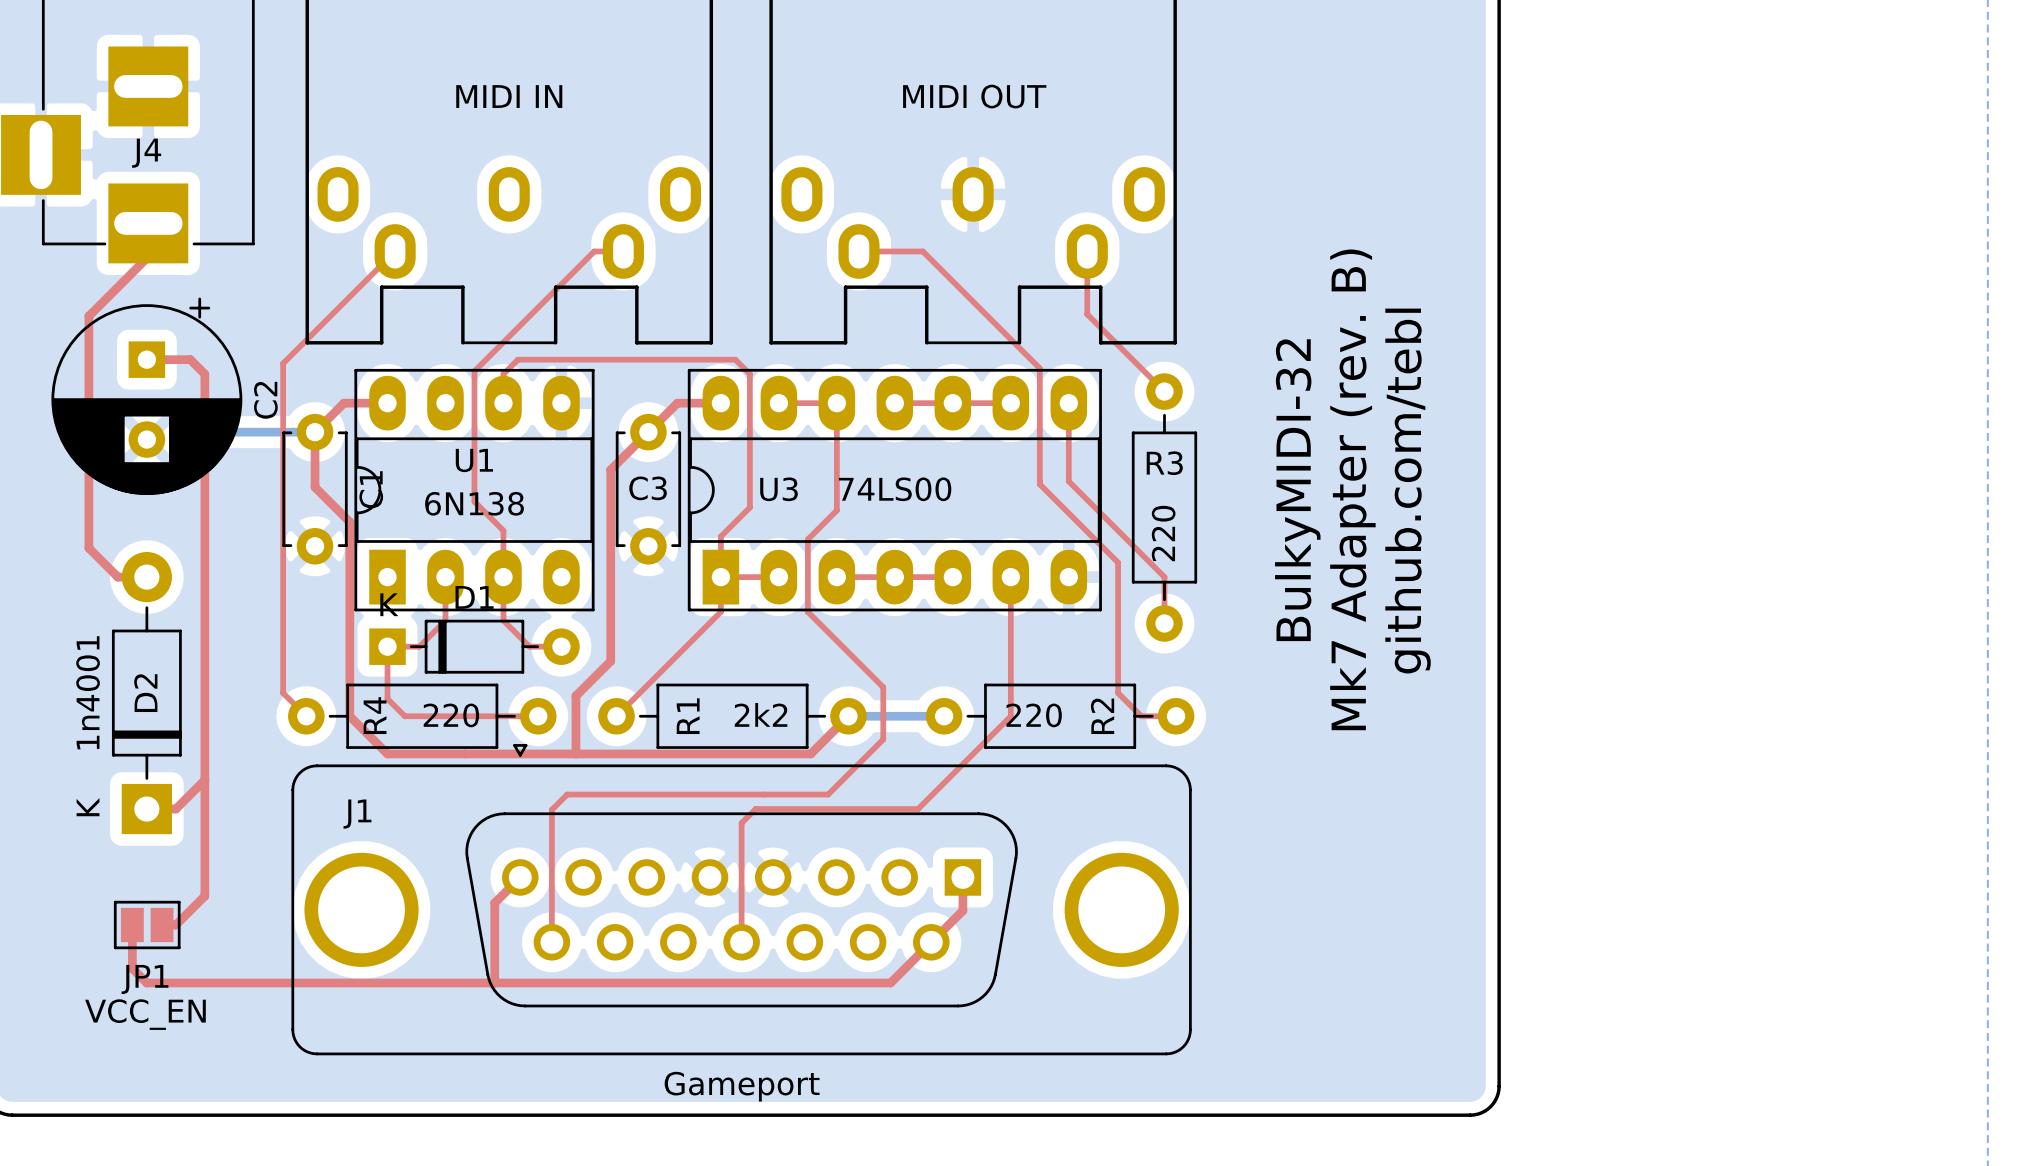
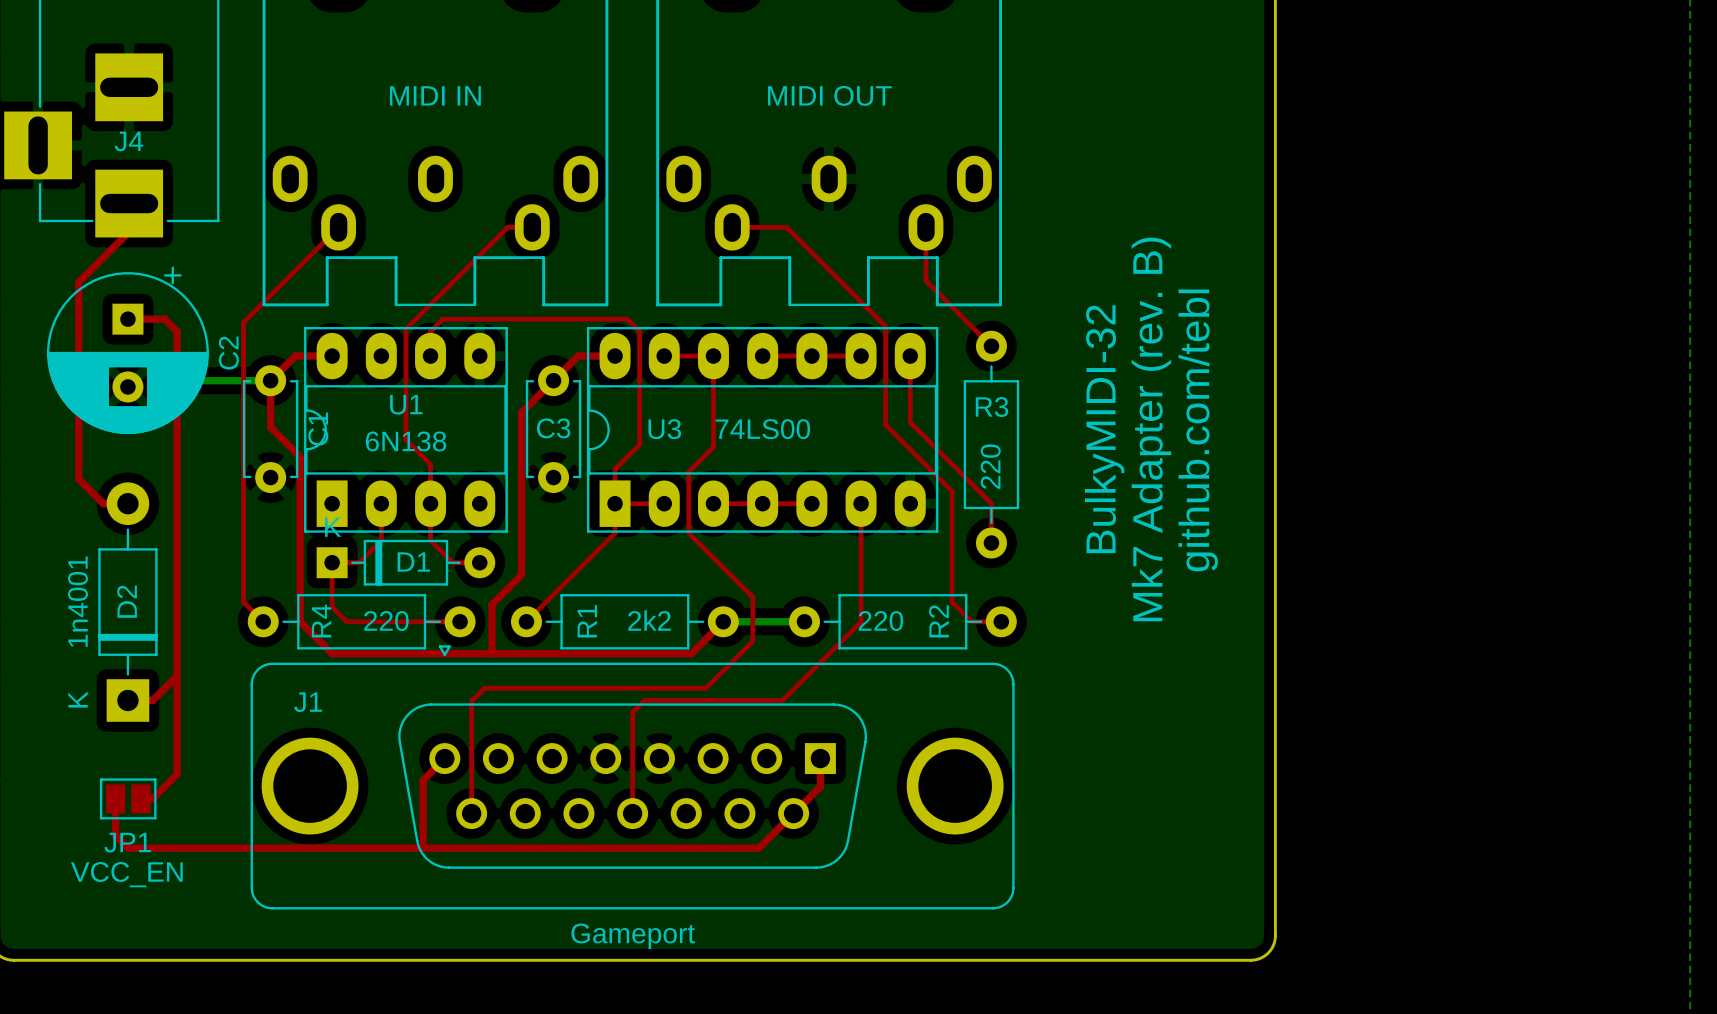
D1 name position: D1 (474, 597) -> D1 (413, 562)

